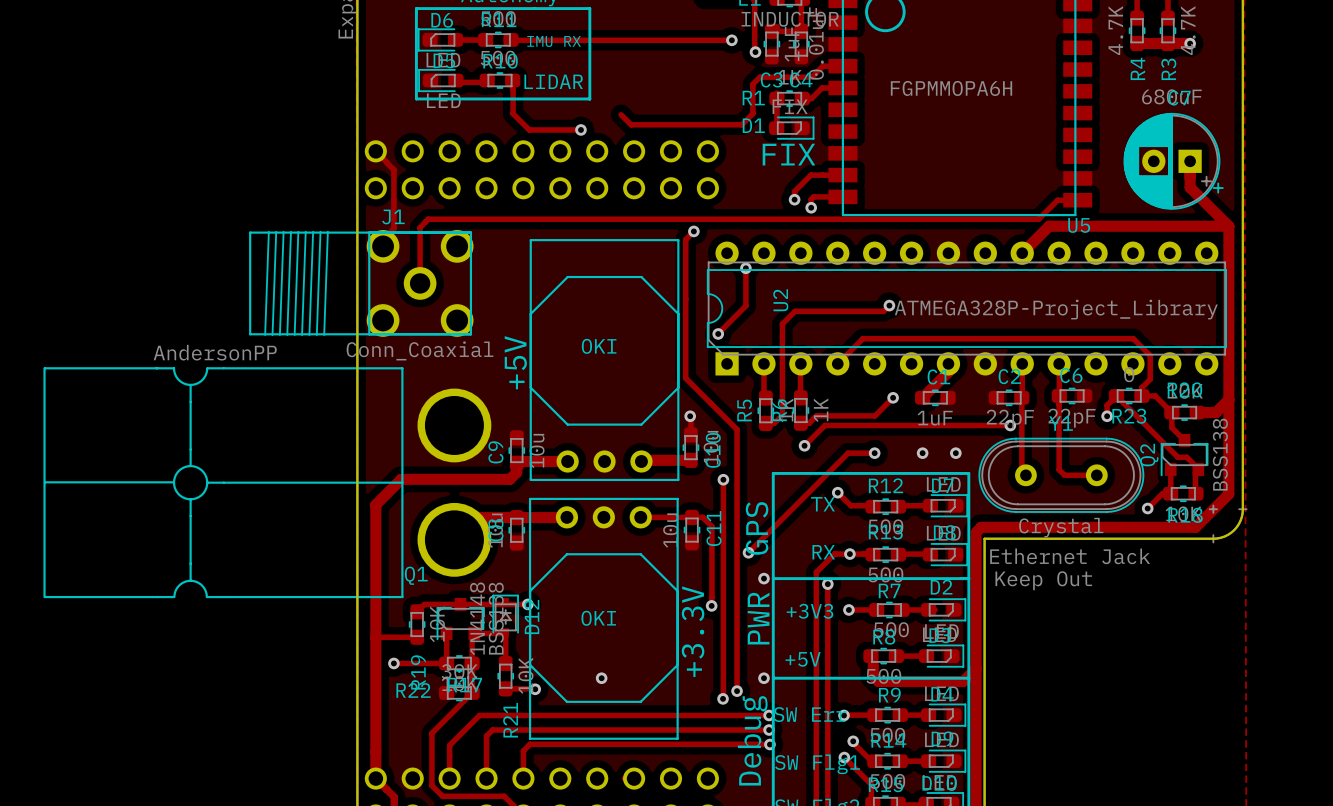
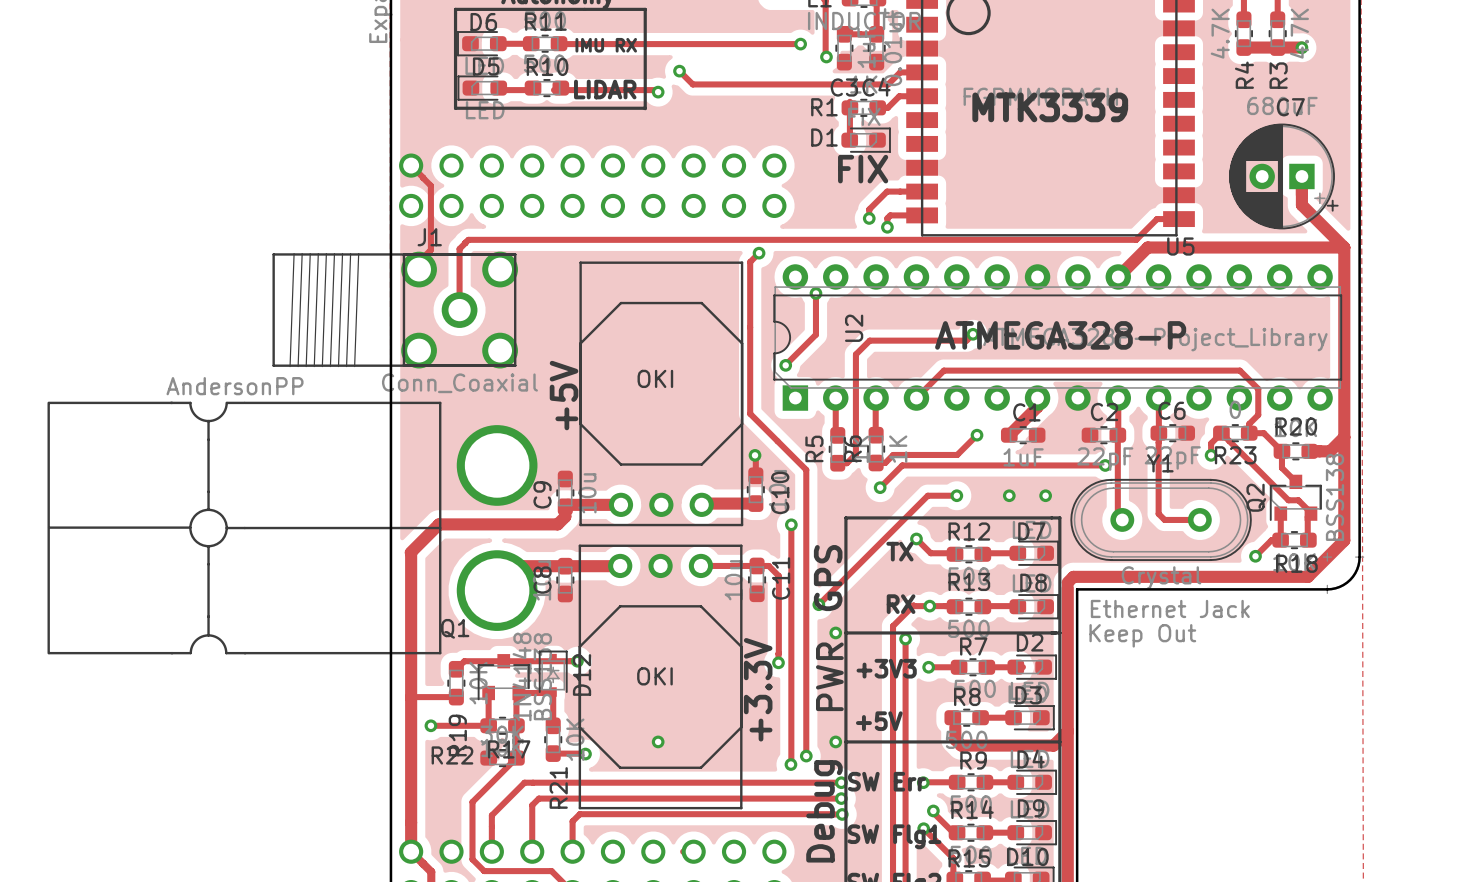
via: none -> (679, 71)
track: (759, 77) (752, 84) (752, 113) (741, 124) (631, 124) (621, 114) -> (831, 84) (692, 84) (679, 71)
track: (512, 80) (513, 113) (529, 129) (580, 129) -> none
track: none -> (553, 90) (656, 90) (658, 92)
via: none -> (658, 92)
text: none -> MTK3339 (1050, 107)
via: (580, 129) -> none
text: none -> ATMEGA328-P (1060, 335)

